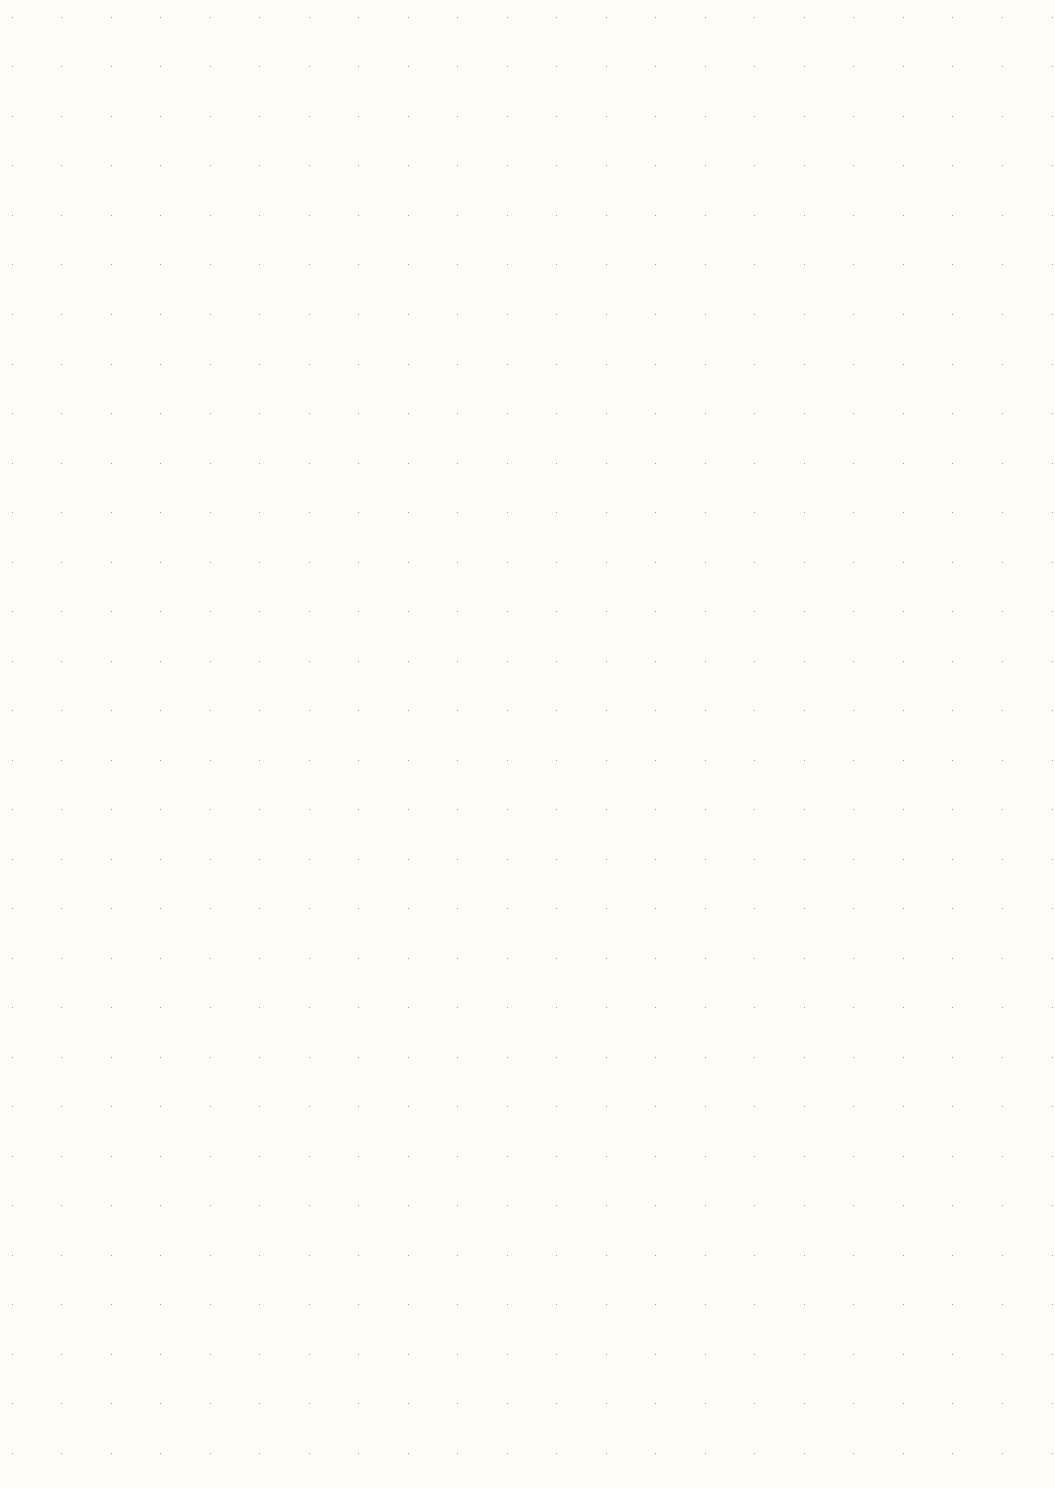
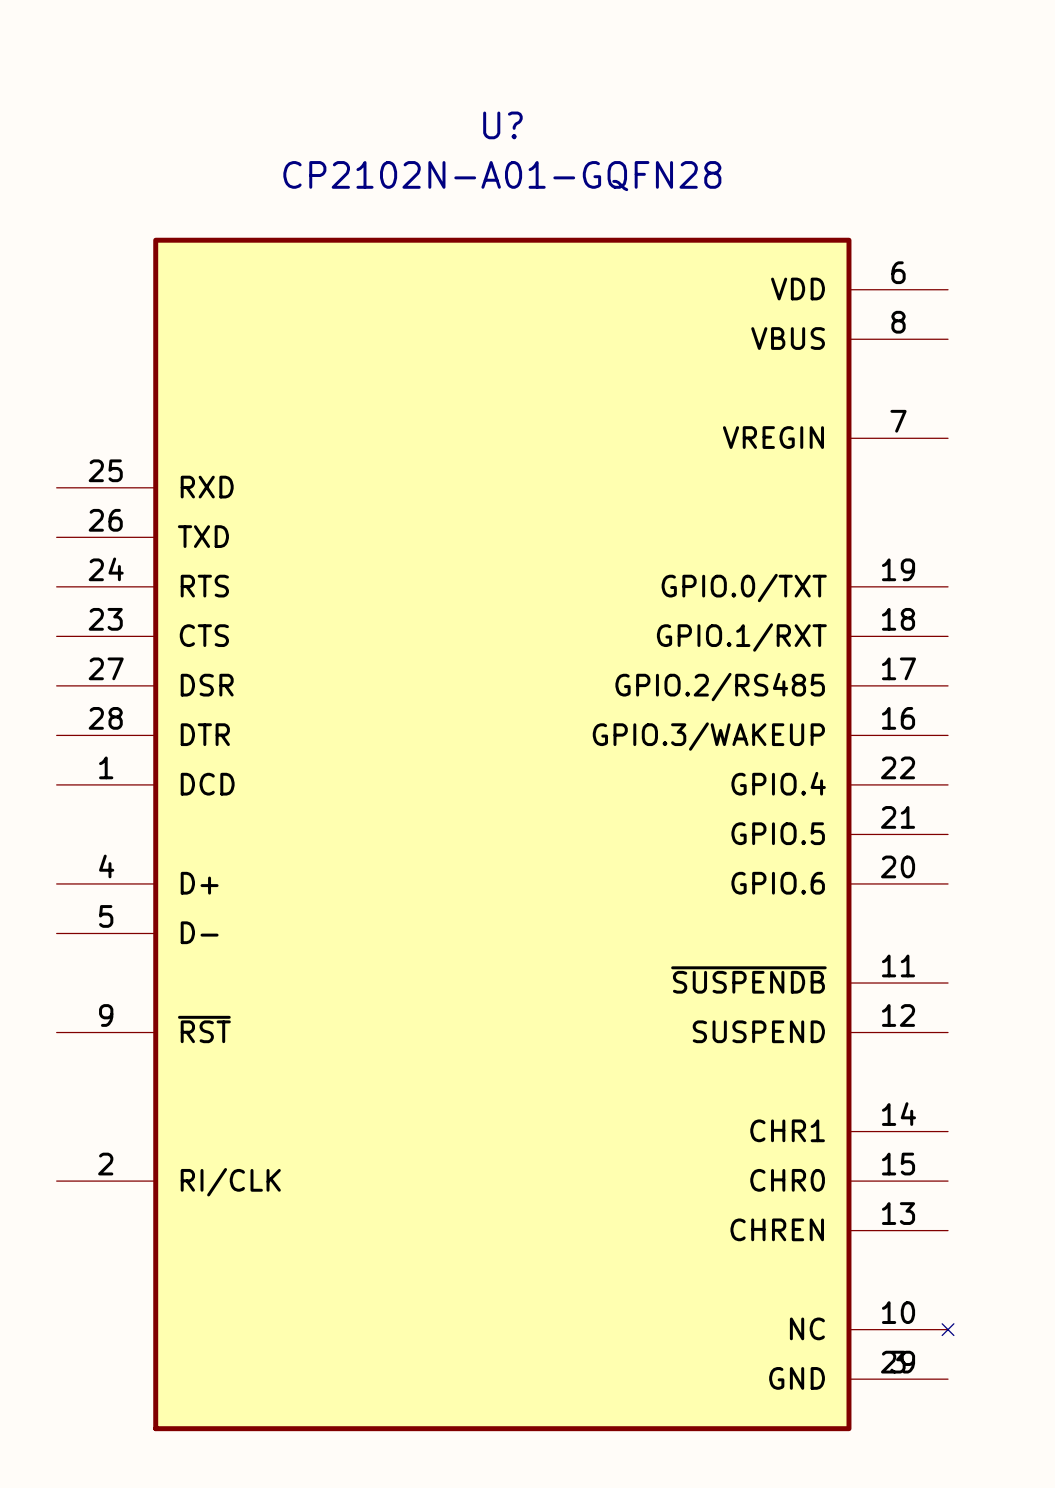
U?: none -> CP2102N-A01-GQFN28 (505, 834)

